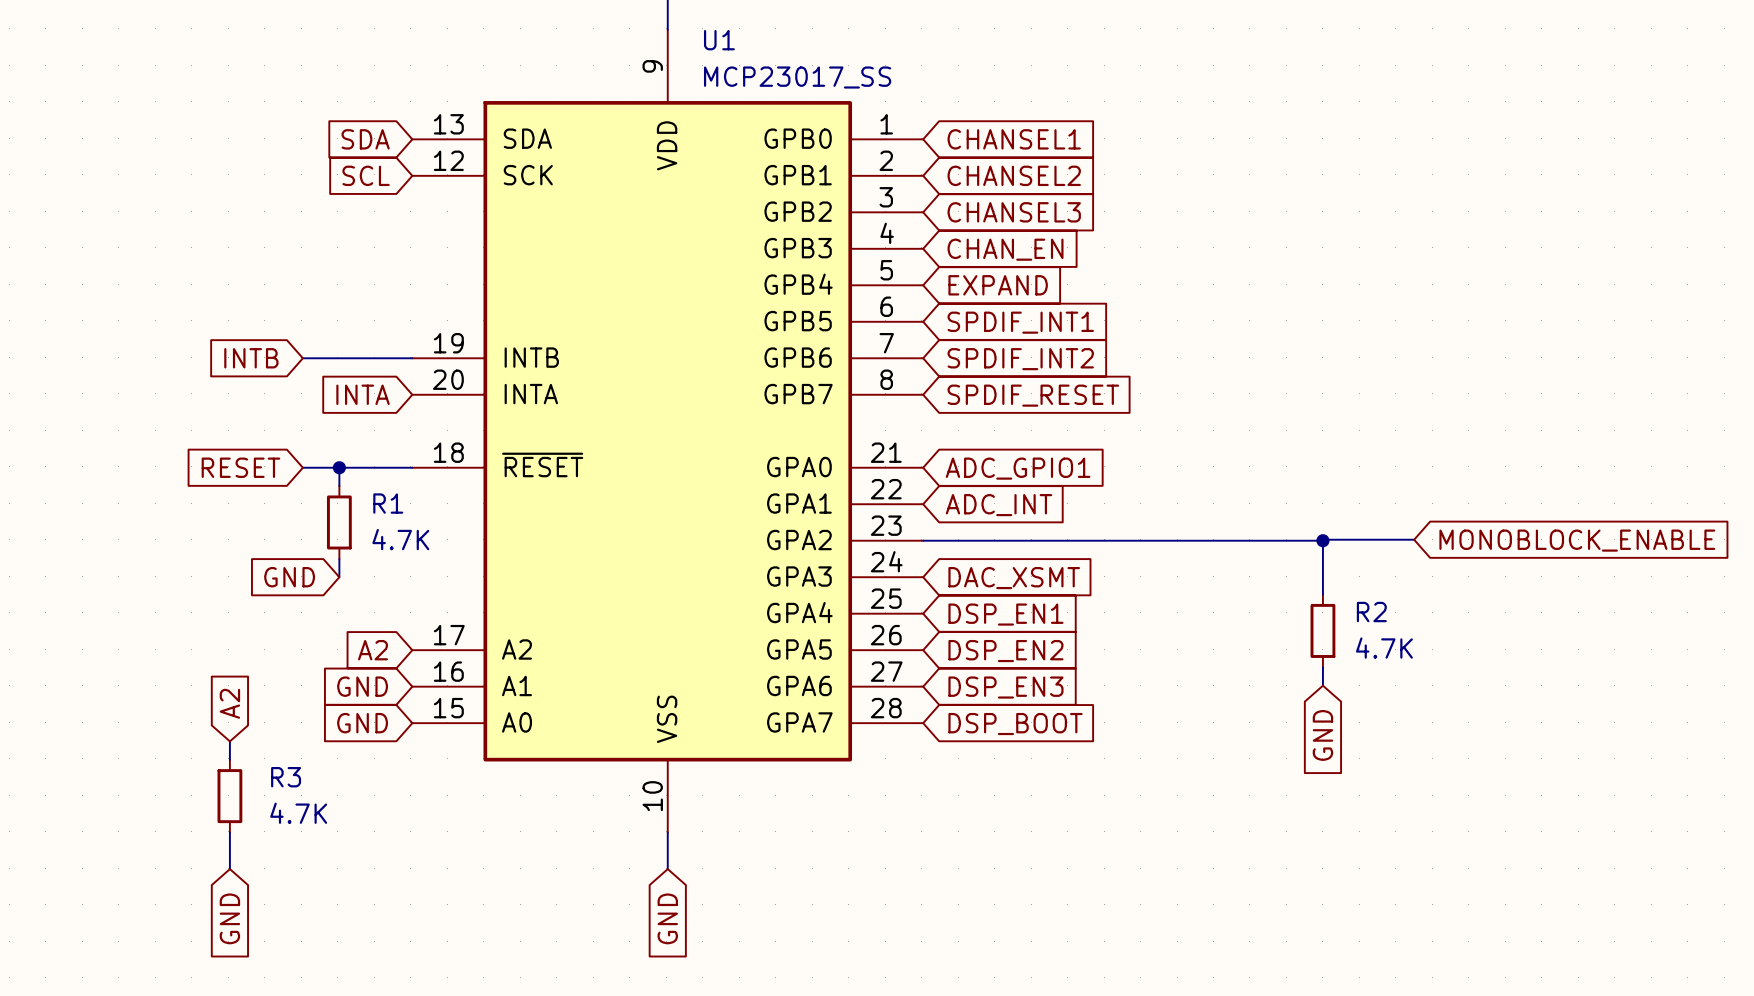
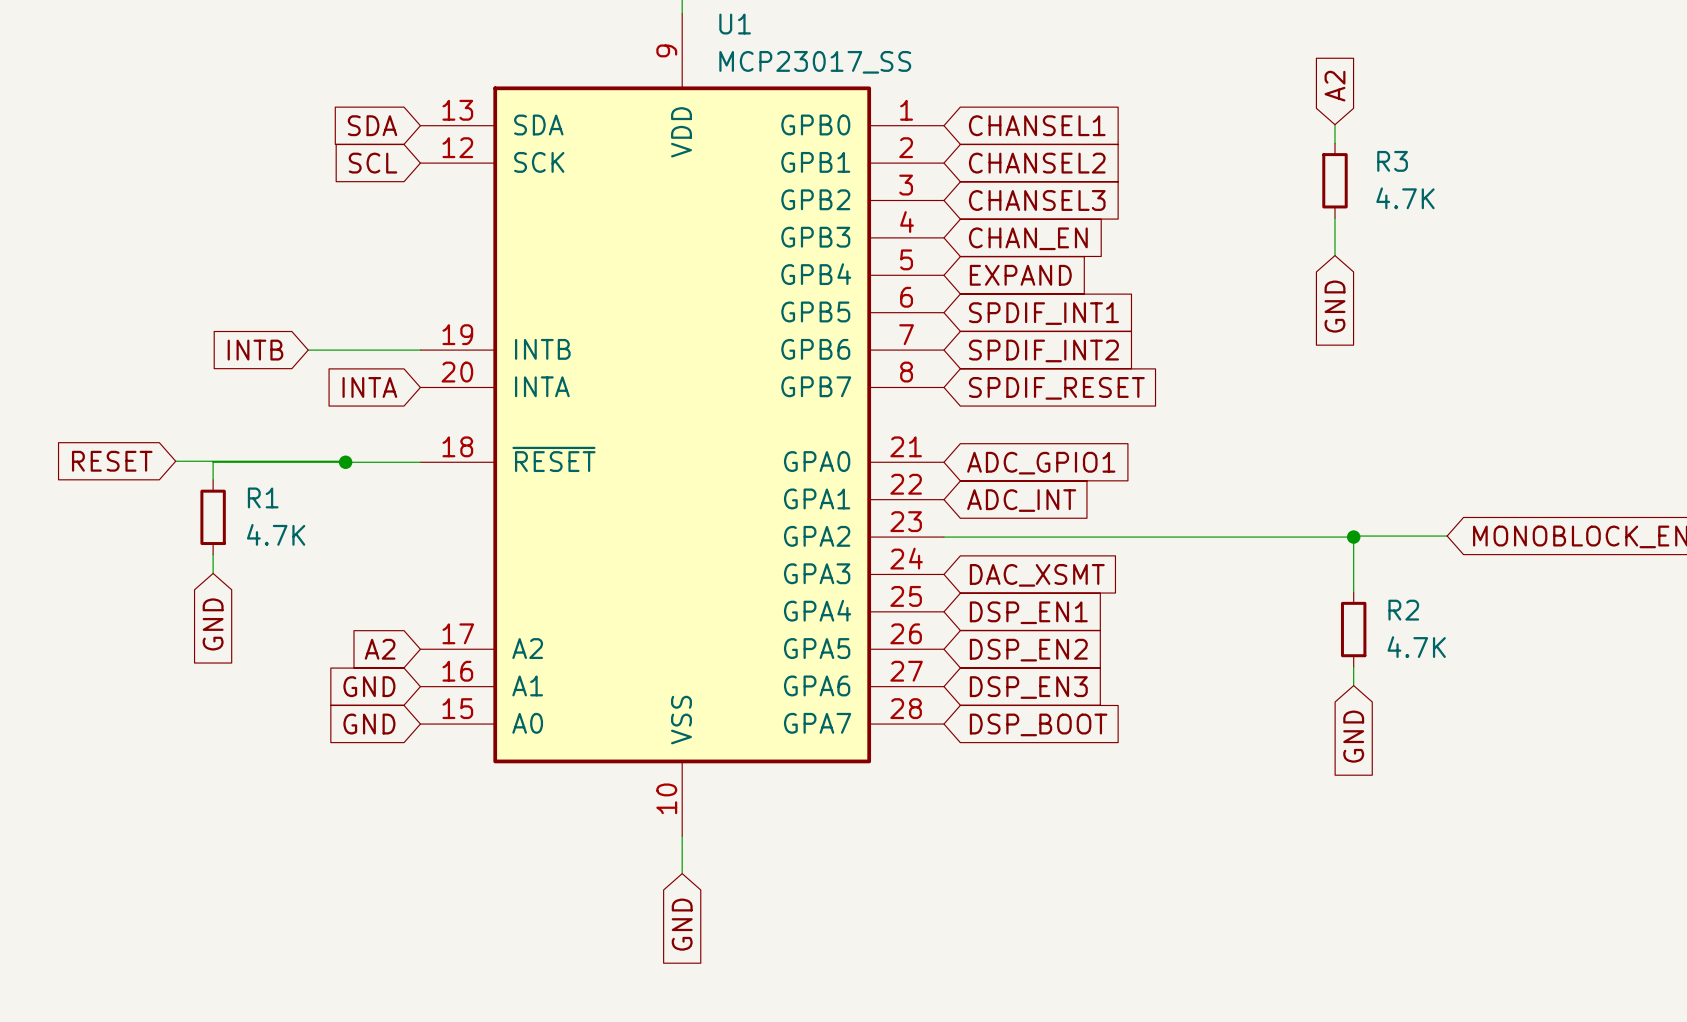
global label: none -> A2 (1334, 86)
wire: none -> (1334, 124) (1334, 143)
wire: none -> (1334, 218) (1334, 255)
global label: none -> GND (1334, 306)
global label position: RESET (240, 467) -> RESET (112, 461)
wire: none -> (308, 462) (213, 462) (213, 479)
wire: (339, 467) (339, 485) -> (345, 462) (175, 461)
R1 position: (339, 522) -> (213, 517)
wire: (339, 558) (339, 577) -> (213, 554) (213, 573)
global label rotation: 0° (289, 577) -> 90° counterclockwise (213, 624)
global label: A2 (229, 703) -> none
wire: (229, 741) (229, 759) -> none
R3 position: (229, 796) -> (1334, 180)
wire: (229, 832) (229, 869) -> none
global label: GND (229, 918) -> none

